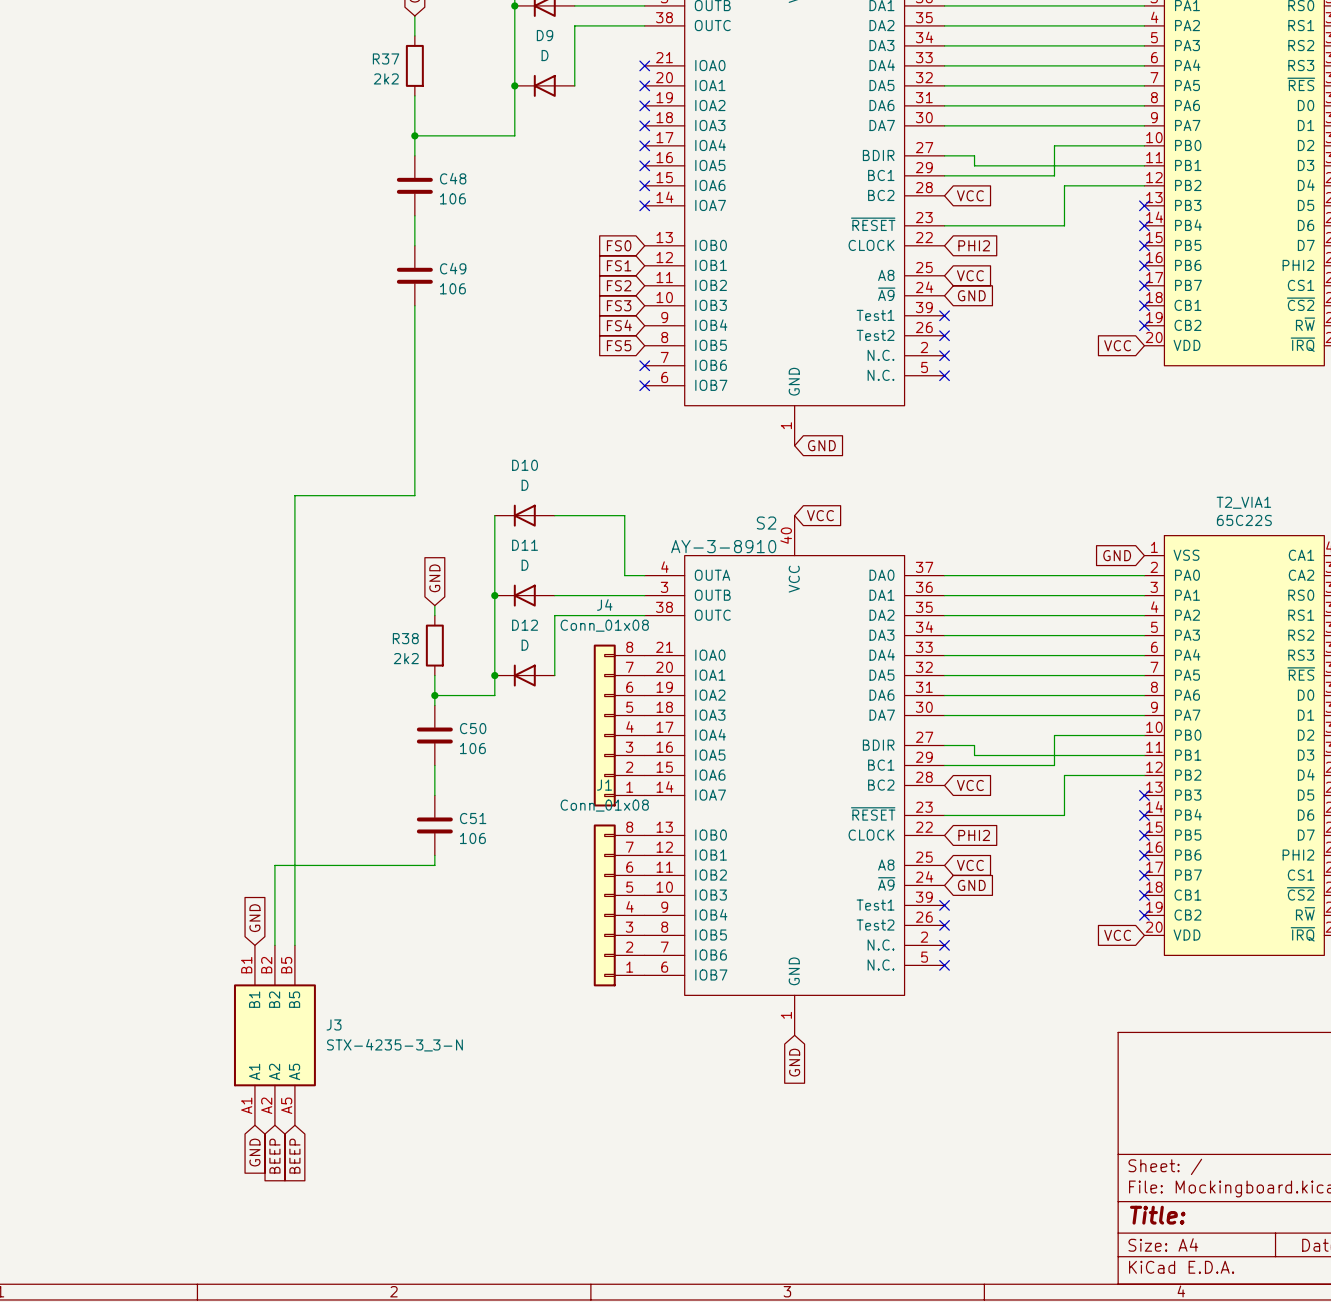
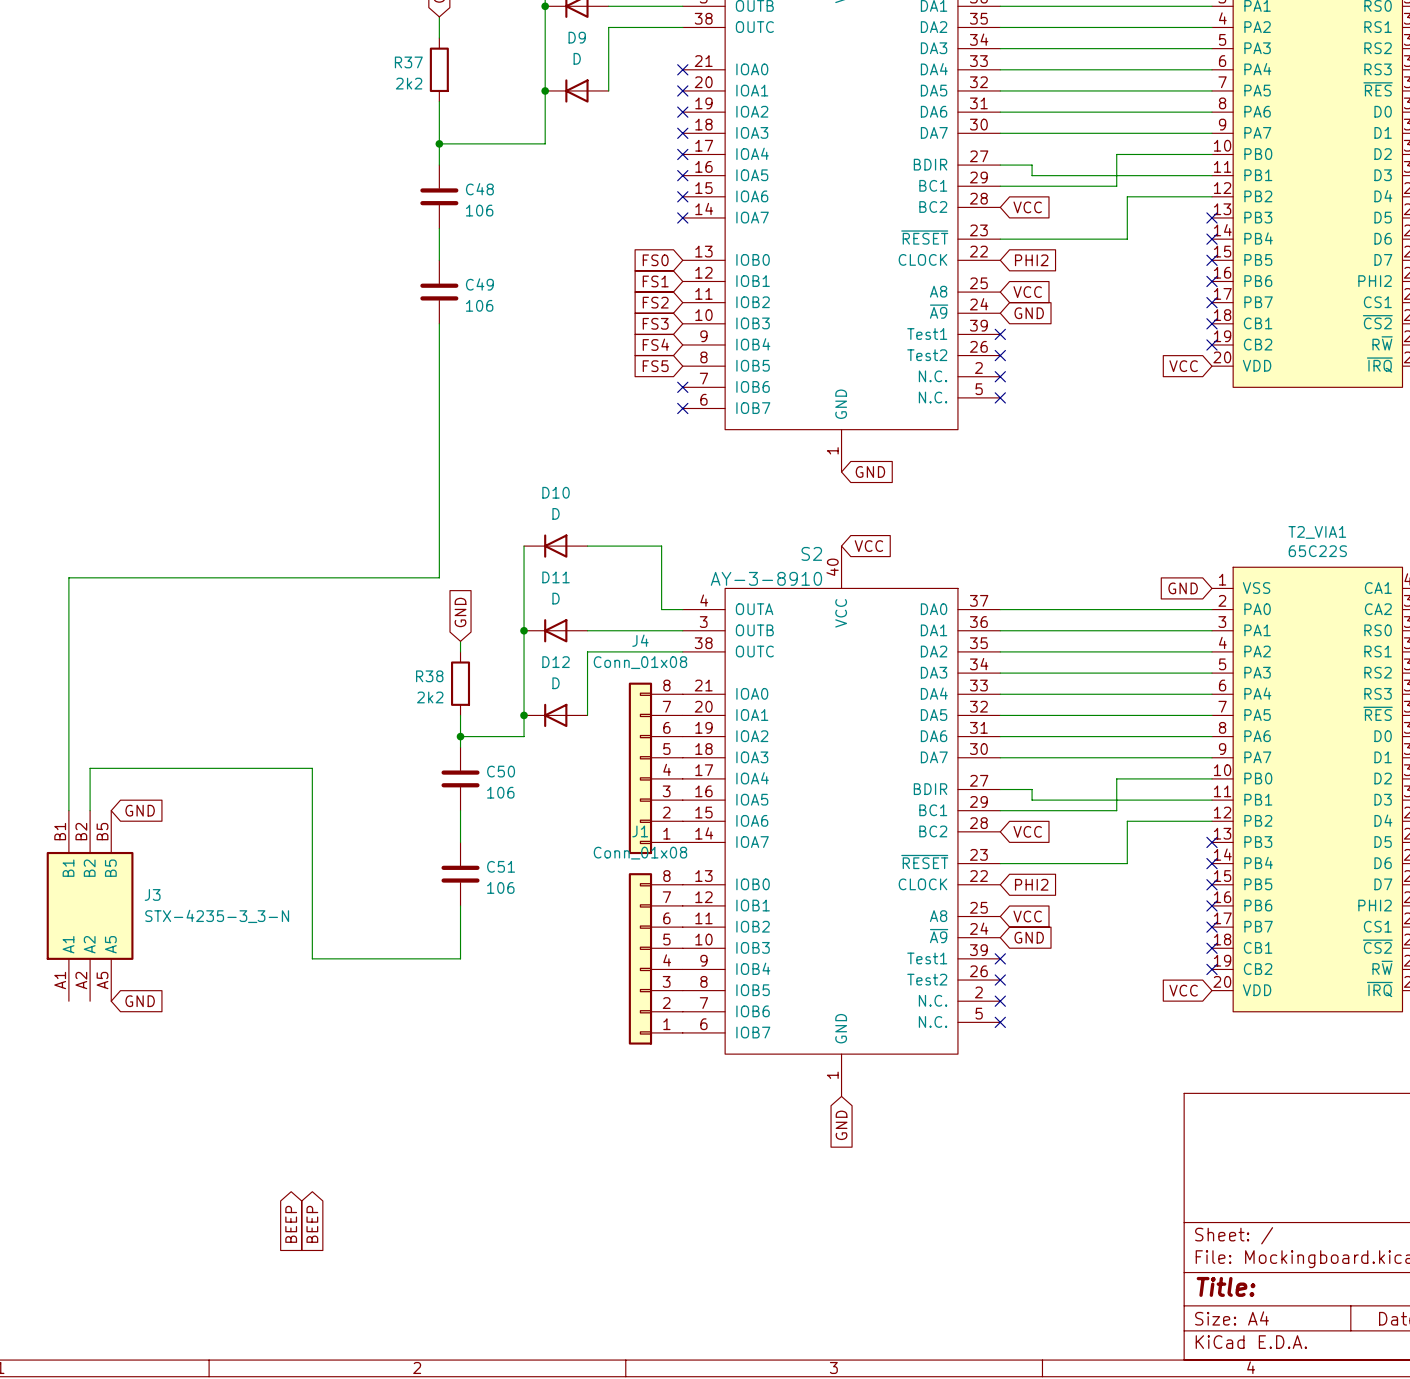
wire: (414, 495) (294, 495) (294, 725) -> (439, 524) (439, 577) (68, 577) (68, 810)
wire: none -> (312, 768) (90, 768) (90, 810)
global label: none -> GND (140, 810)
wire: (434, 865) (274, 865) (274, 945) -> (460, 916) (460, 958) (312, 958)
wire: (294, 905) (294, 945) -> none
global label: GND (254, 918) -> none
global label: none -> GND (140, 1001)
J3 position: (274, 1035) -> (90, 905)
global label: GND (254, 1152) -> none

